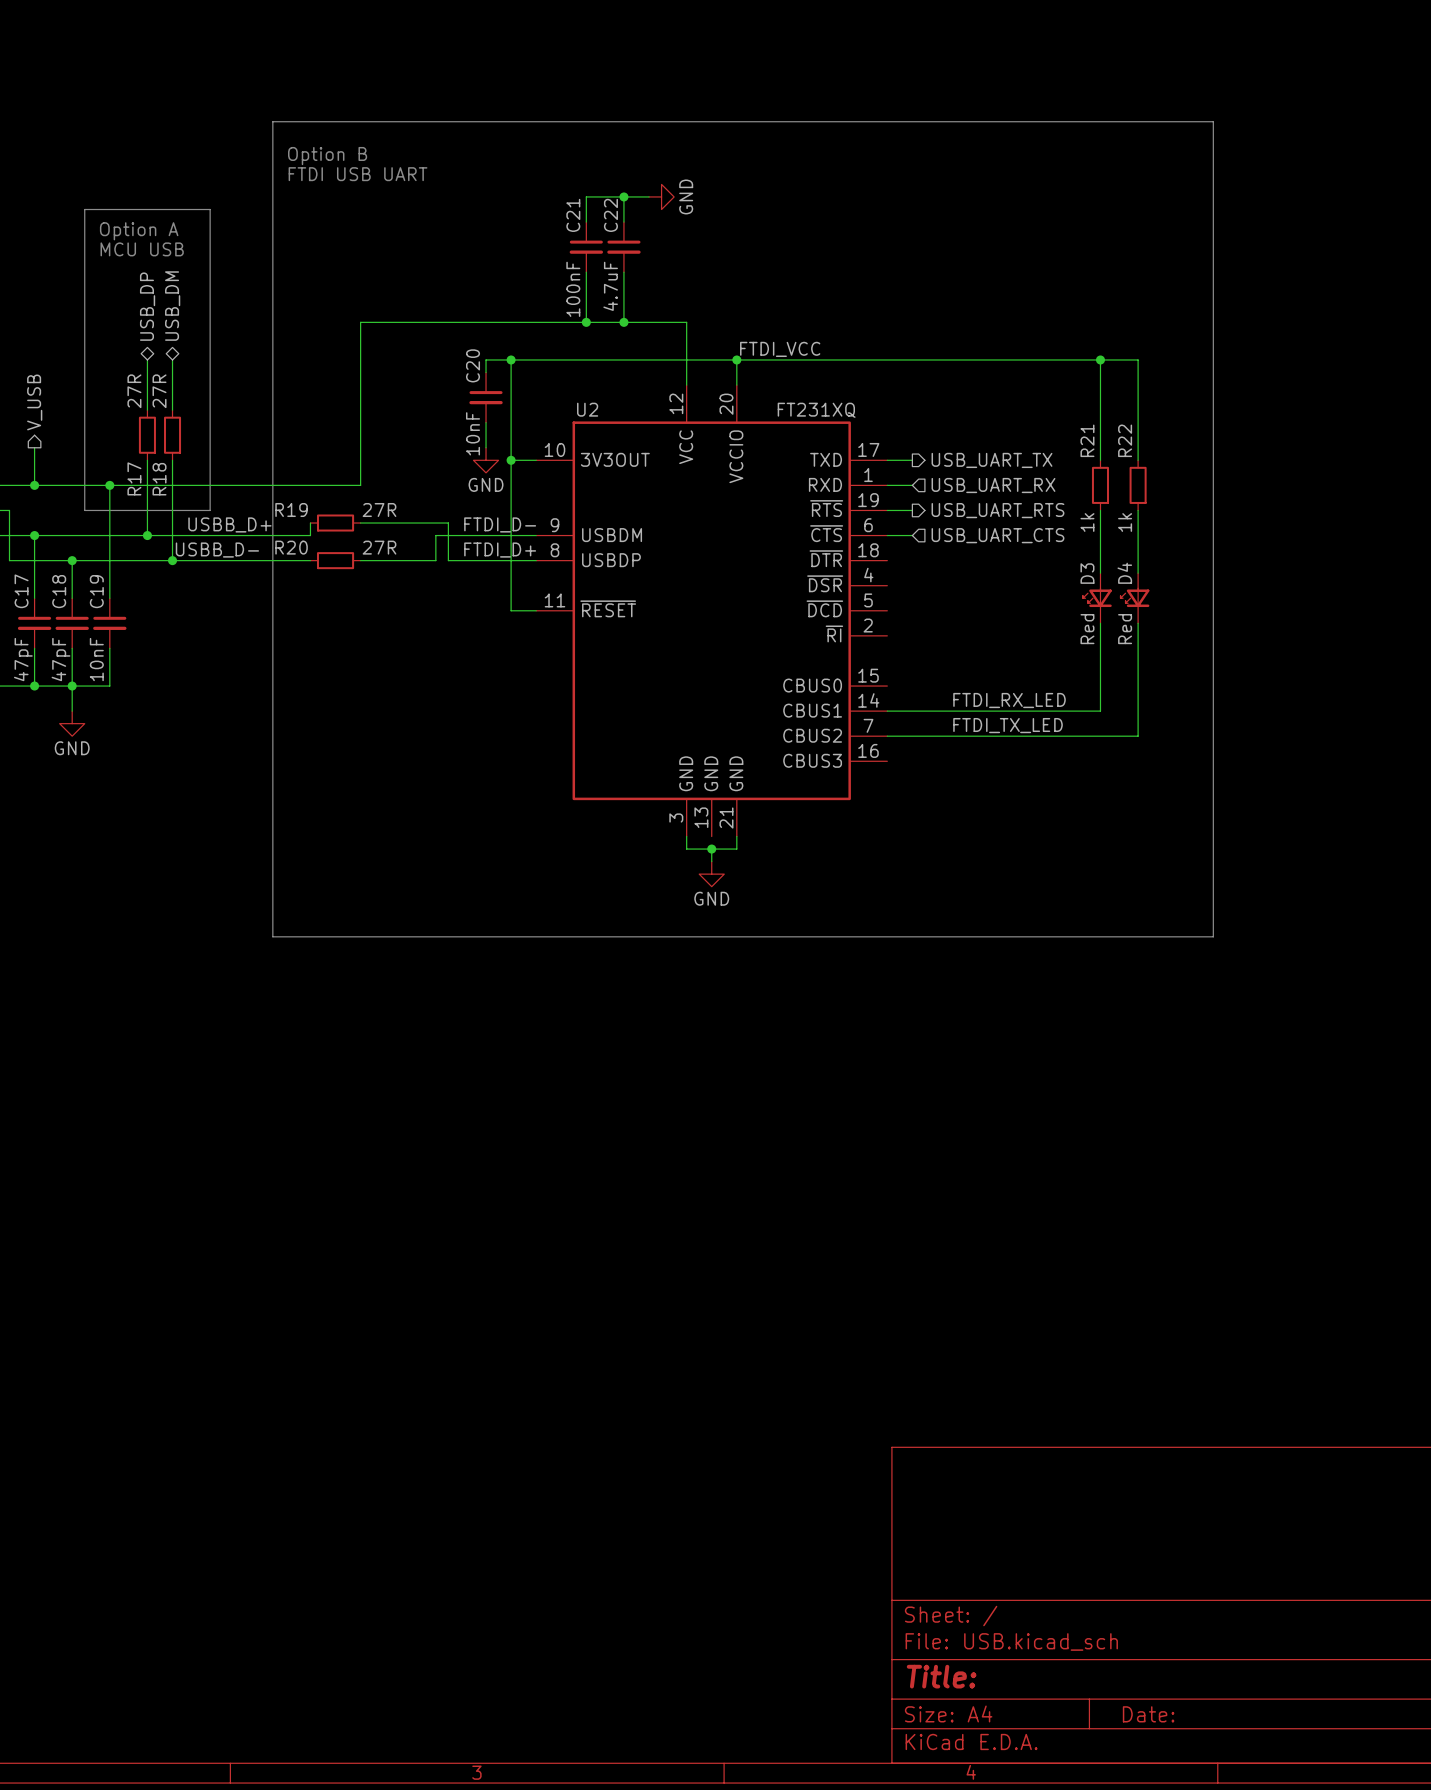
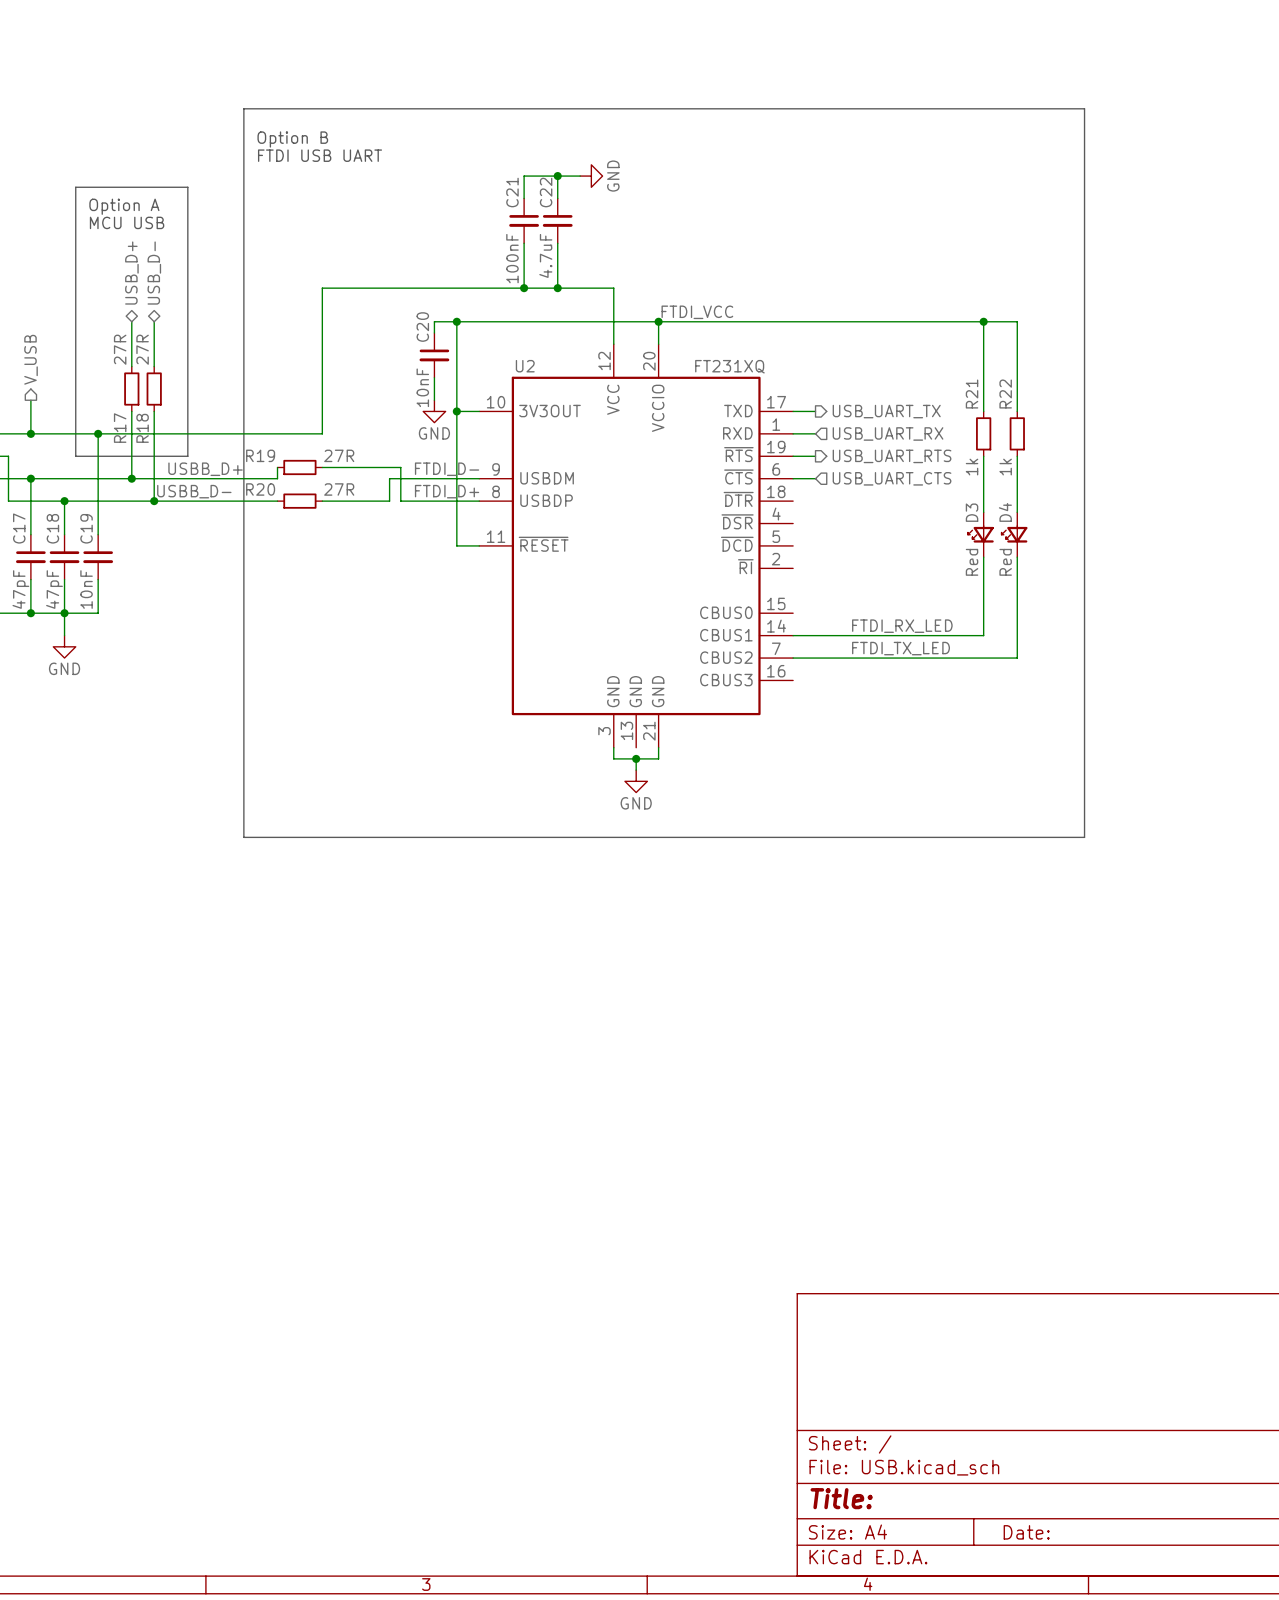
hierarchical label: USB_DP (147, 306) -> USB_D+ (131, 273)
hierarchical label: USB_DM (172, 306) -> USB_D- (154, 273)

